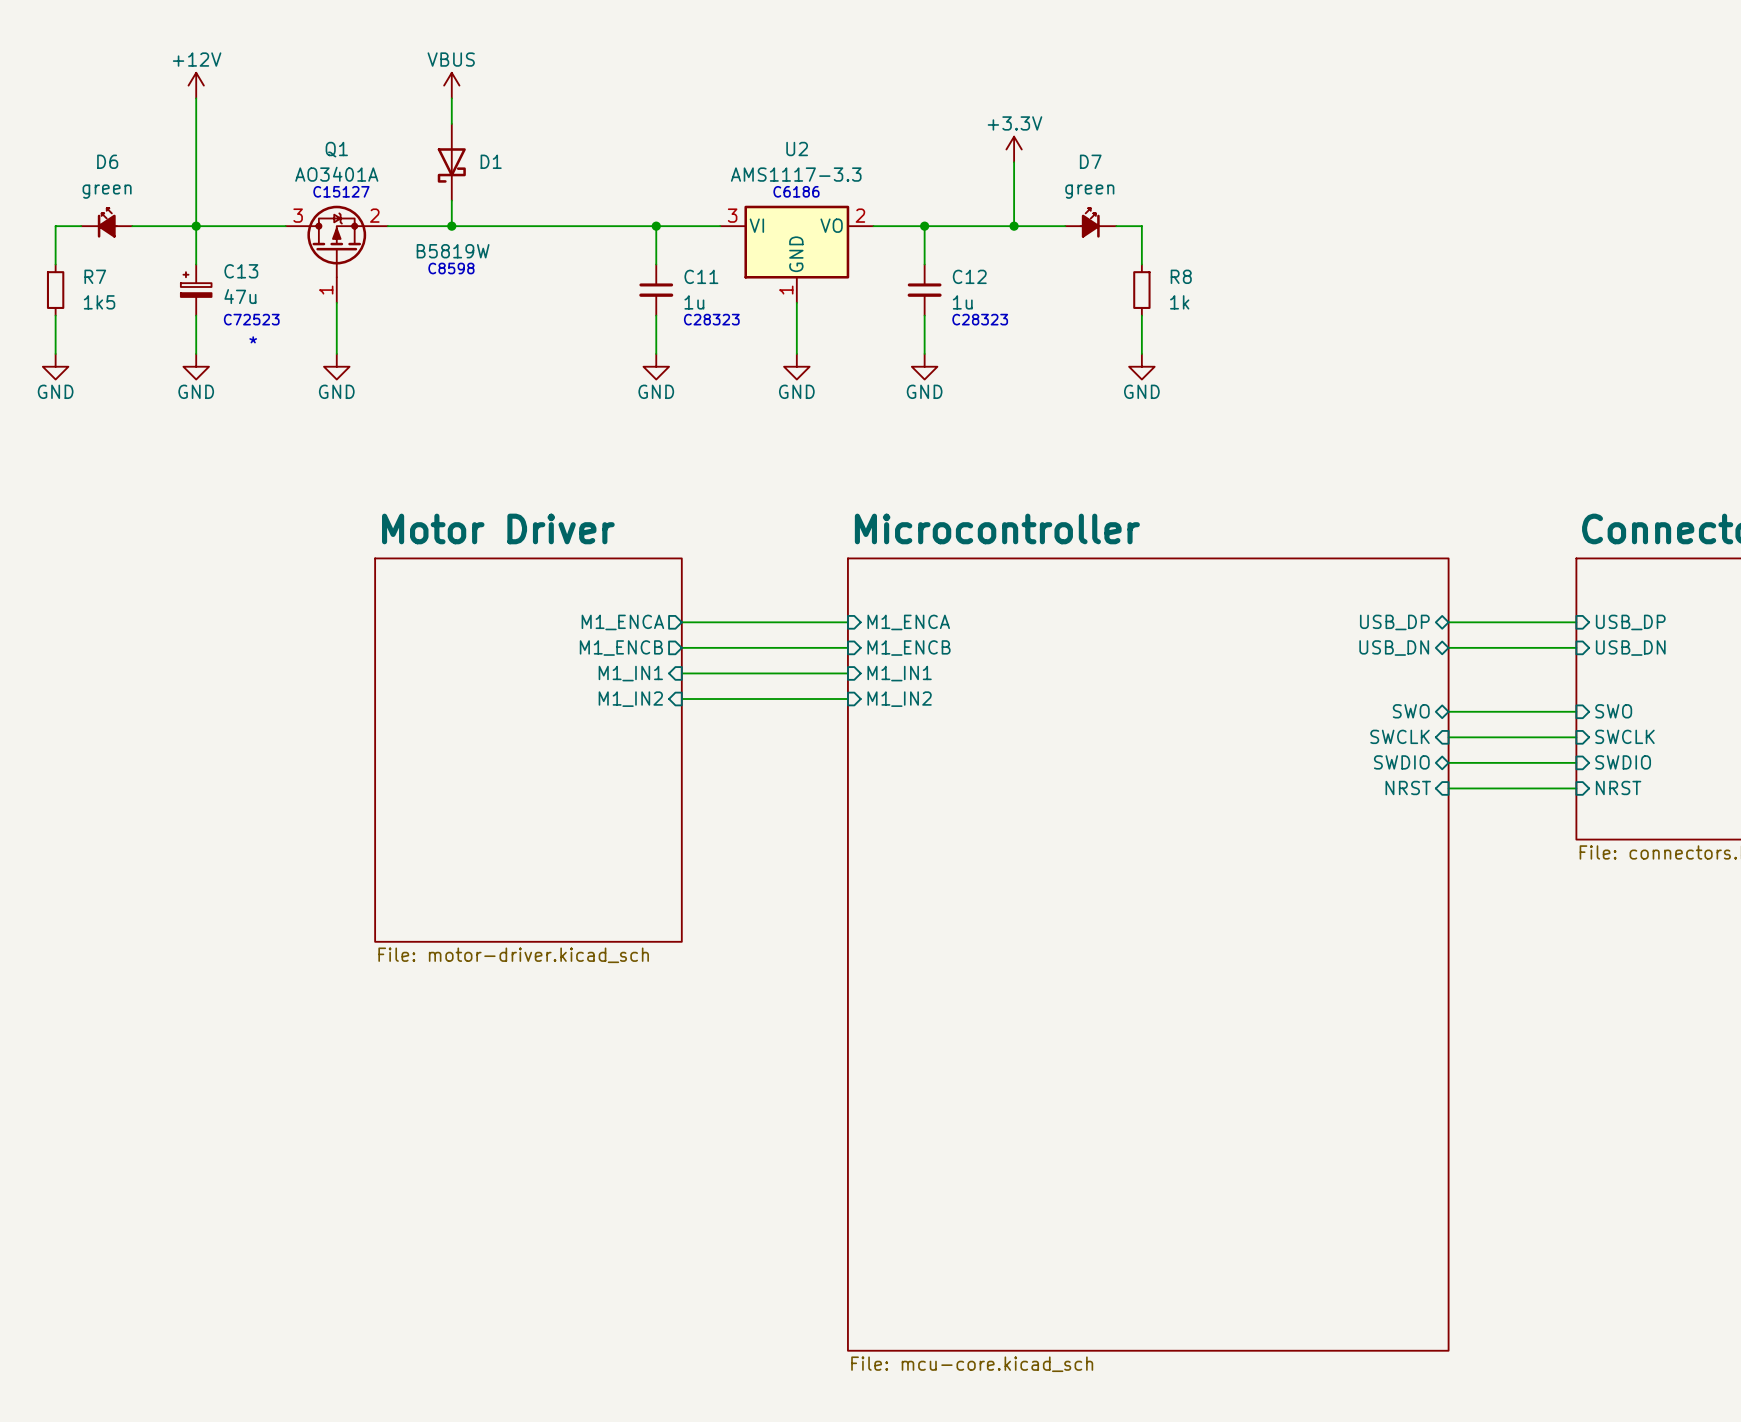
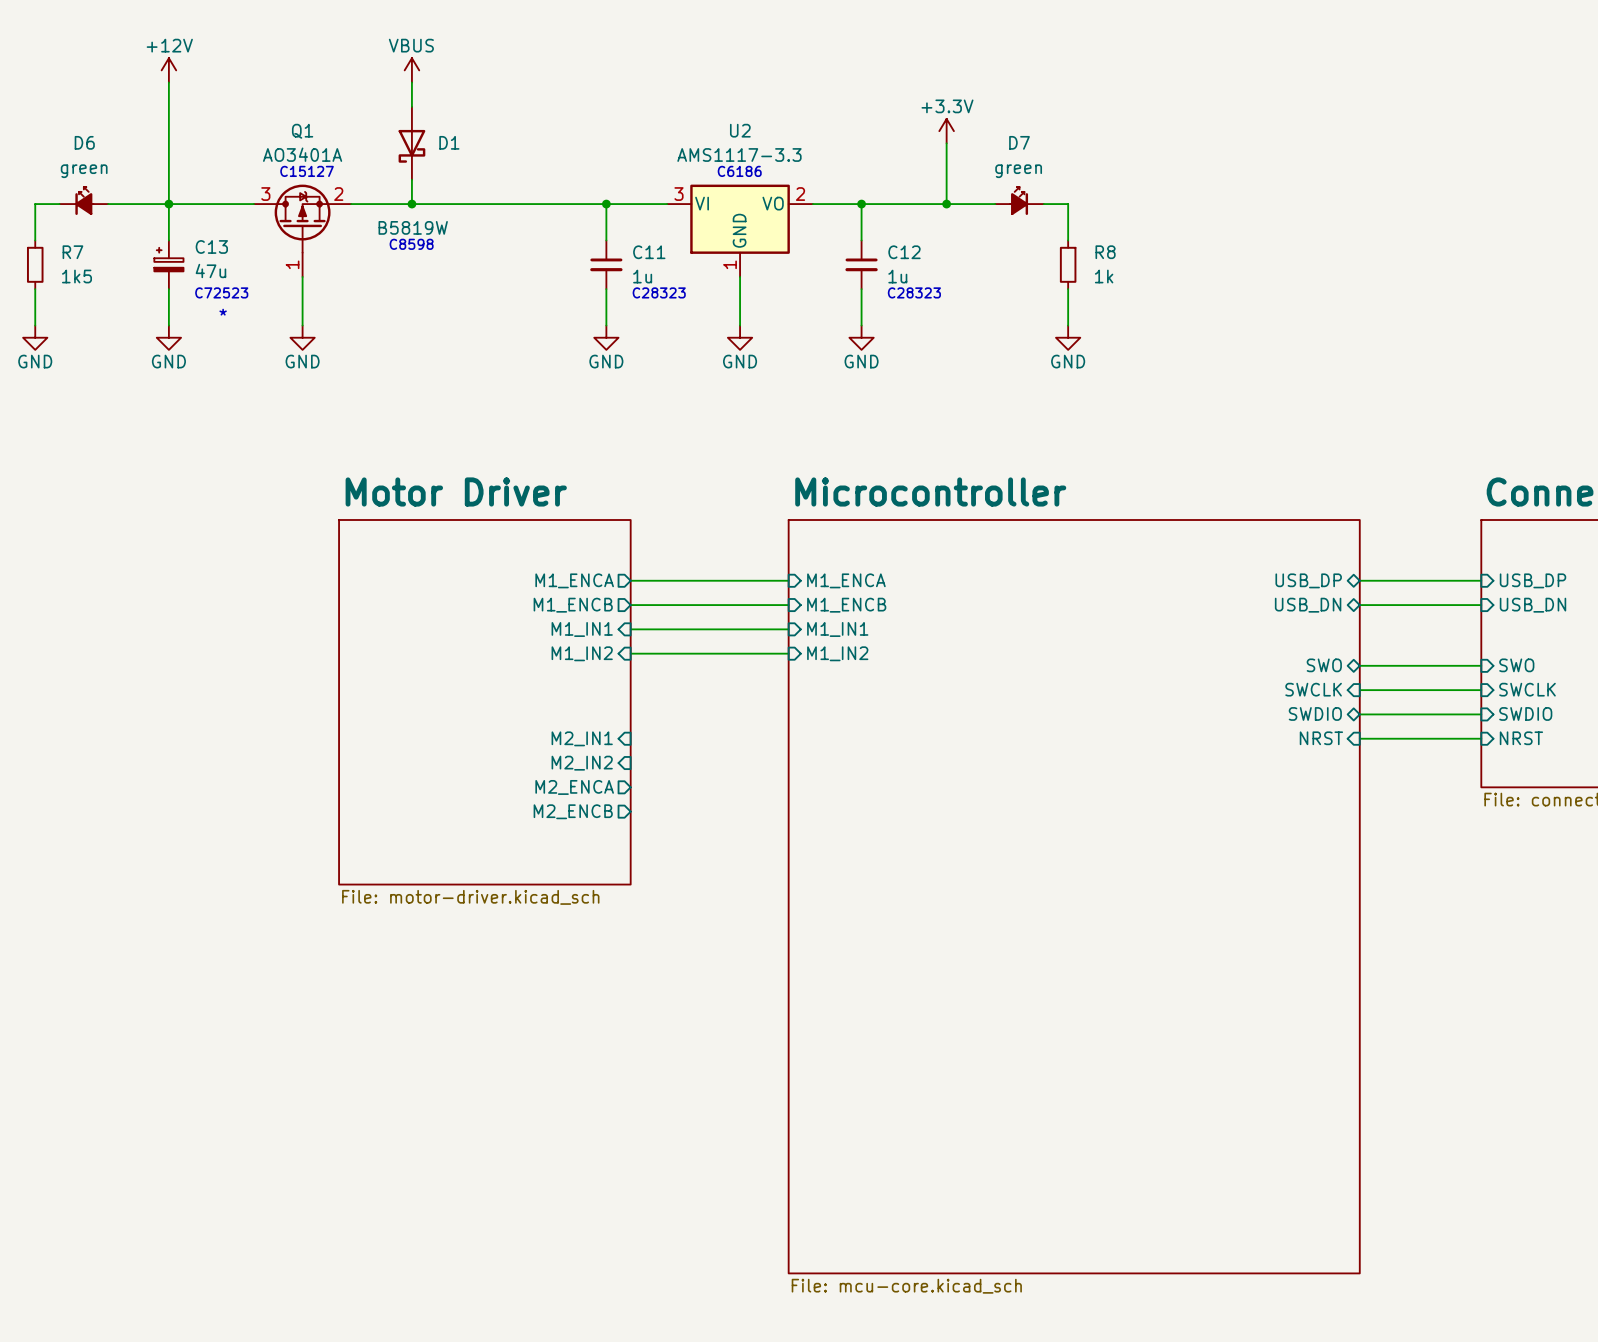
sheet pin: none -> M2_IN1 (582, 738)
sheet pin: none -> M2_IN2 (582, 763)
sheet pin: none -> M2_ENCA (574, 787)
sheet pin: none -> M2_ENCB (573, 811)

